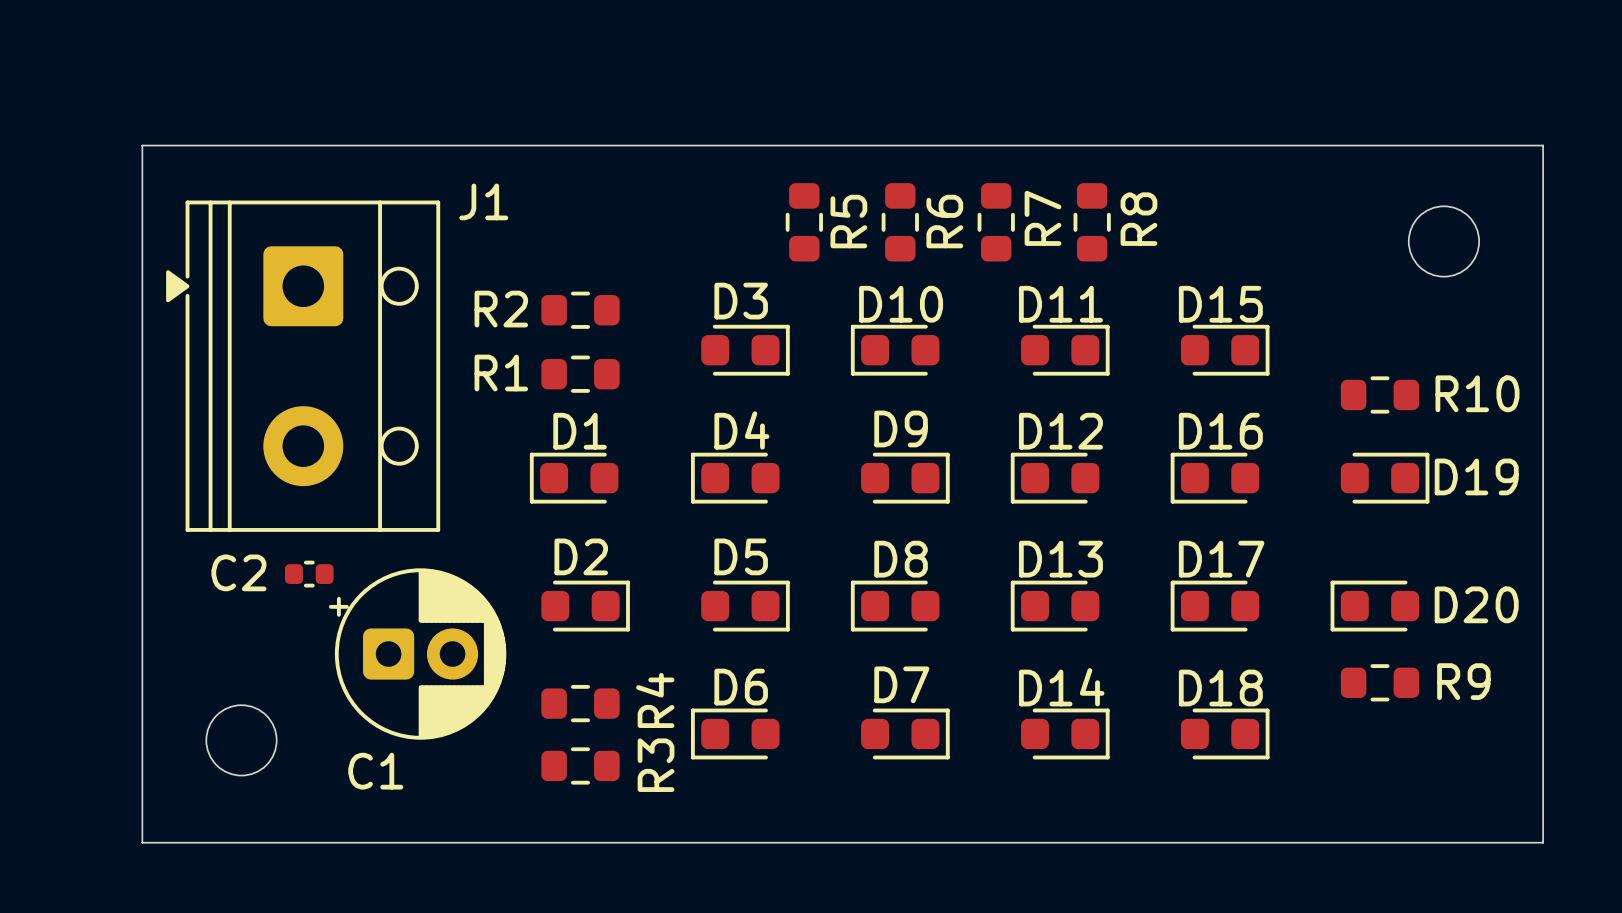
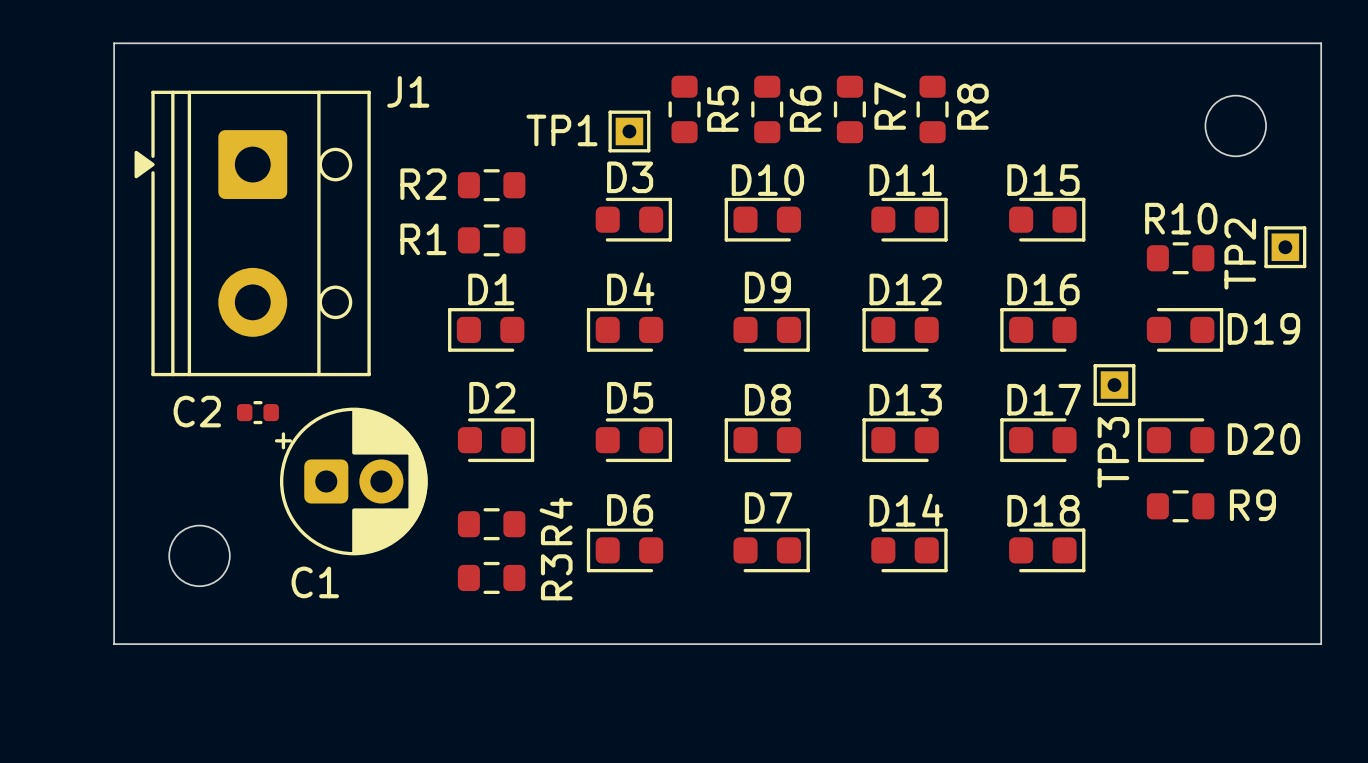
TP1: none -> (629, 131)
TP2: none -> (1285, 247)
R10 name position: R10 (1477, 393) -> R10 (1181, 218)
TP3: none -> (1114, 385)

